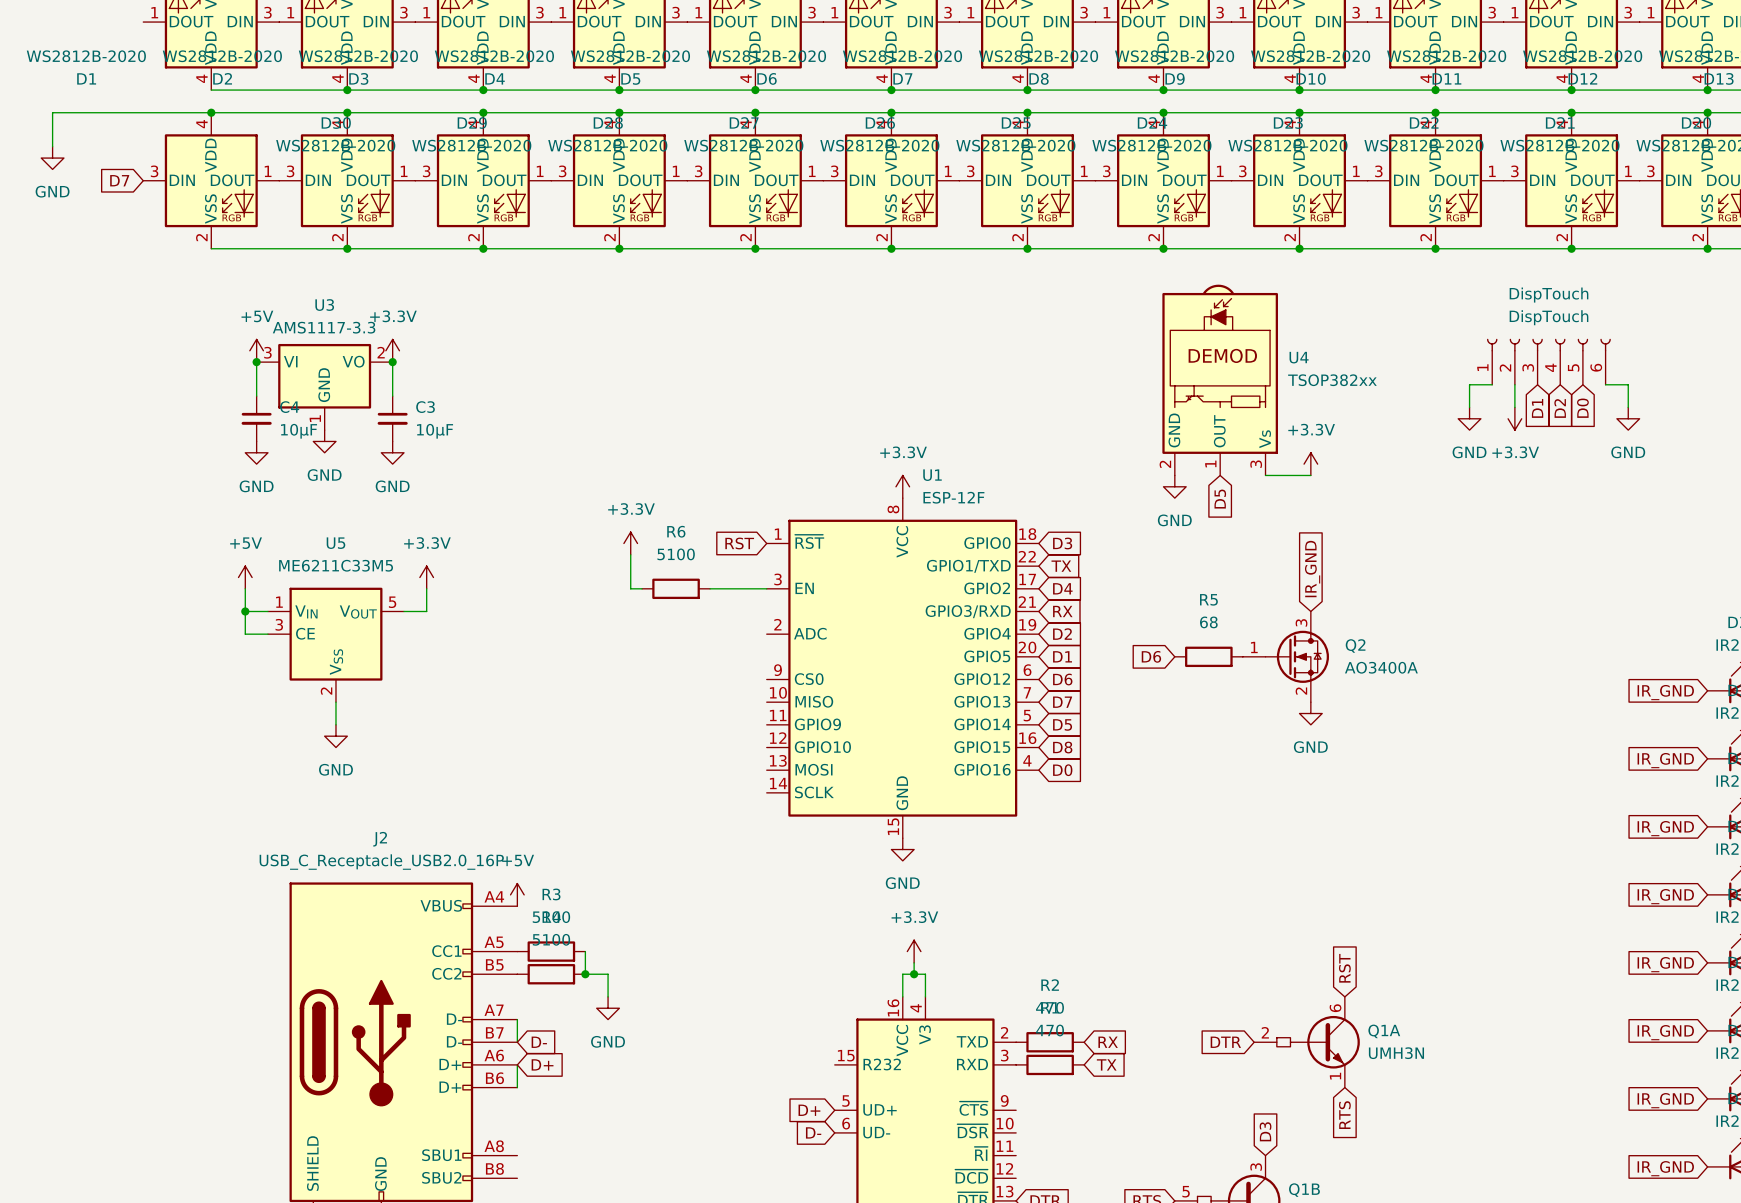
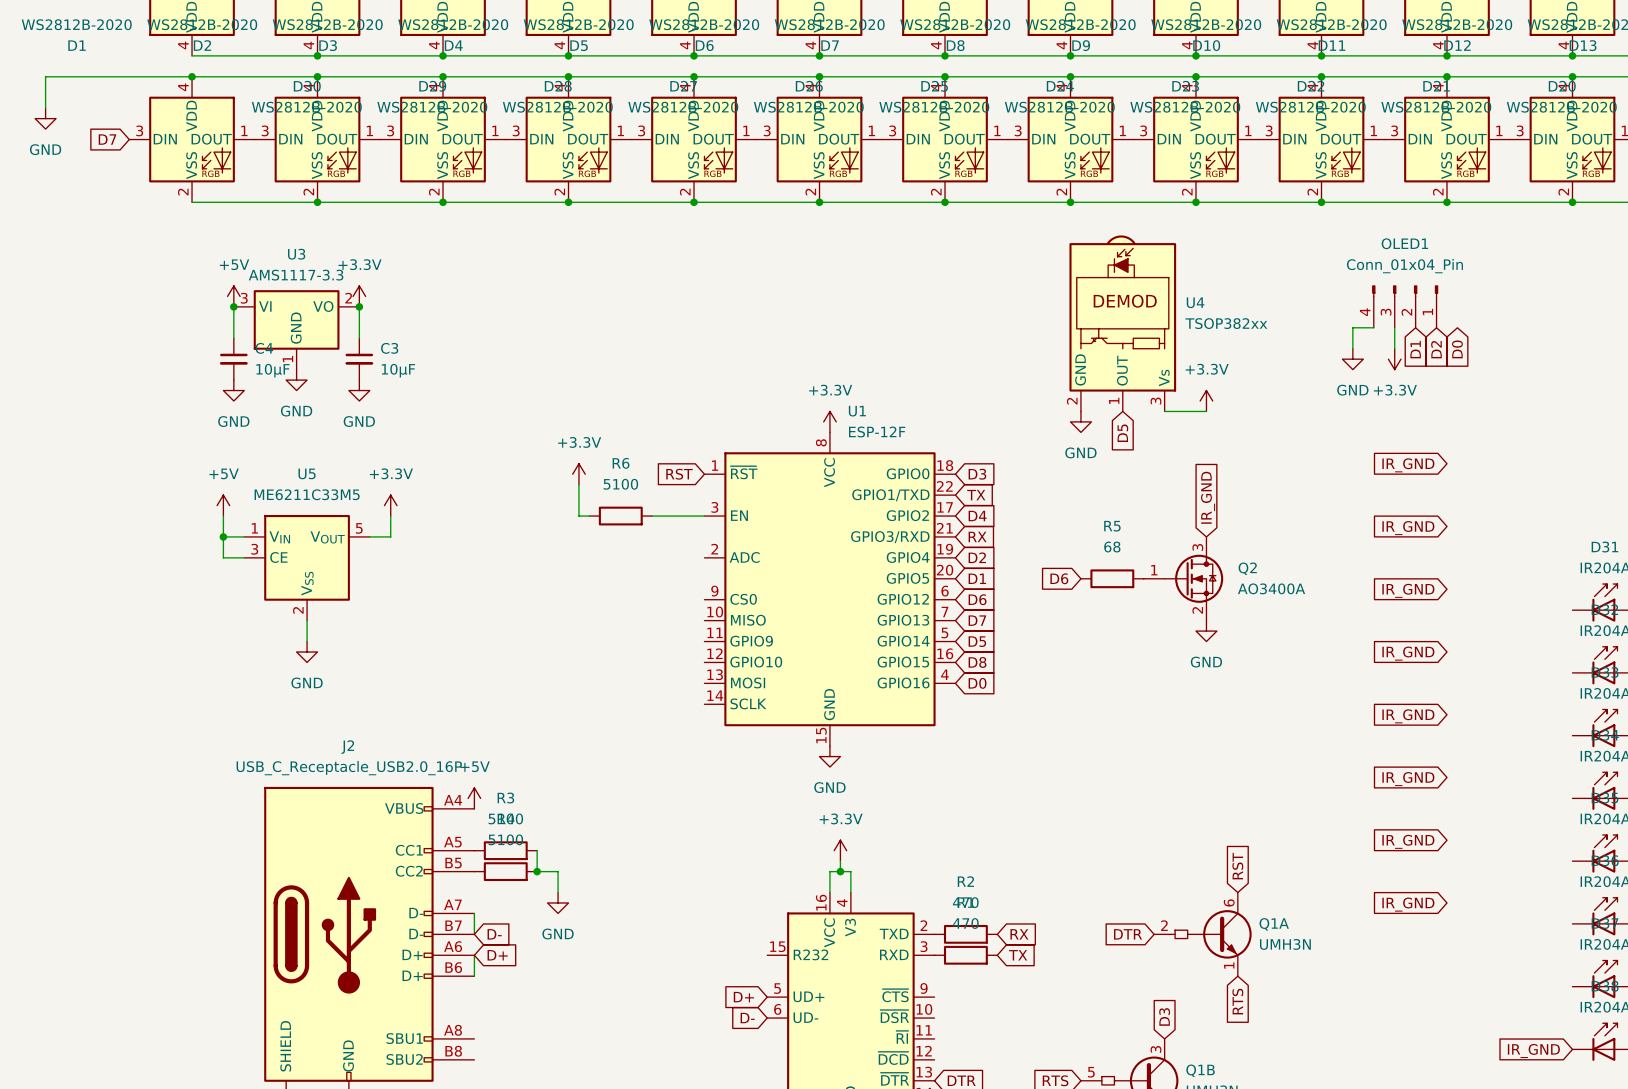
OLED1: none -> Conn_01x04_Pin (1405, 306)
DispTouch: DispTouch (1548, 361) -> none
wire: (1605, 384) (1628, 384) (1628, 407) -> none
power symbol: GND (1628, 418) -> none
global label: none -> IR_GND (1408, 465)
global label: none -> IR_GND (1408, 528)
global label: none -> IR_GND (1408, 590)
global label: IR_GND (1665, 692) -> none
global label: none -> IR_GND (1408, 653)
global label: IR_GND (1665, 760) -> none
global label: none -> IR_GND (1408, 716)
global label: IR_GND (1665, 828) -> none
global label: none -> IR_GND (1408, 779)
global label: IR_GND (1665, 896) -> none
global label: none -> IR_GND (1408, 841)
global label: IR_GND (1665, 964) -> none
global label: none -> IR_GND (1408, 904)
global label: IR_GND (1665, 1032) -> none
global label: IR_GND (1665, 1100) -> none

